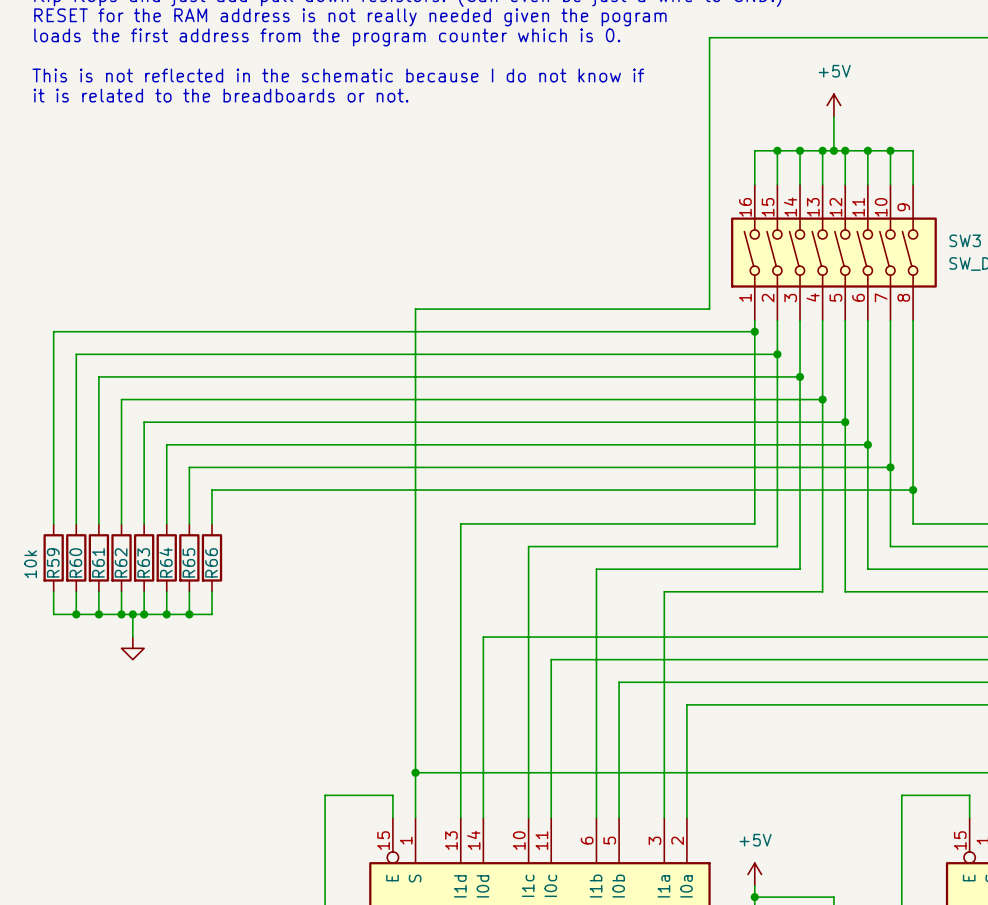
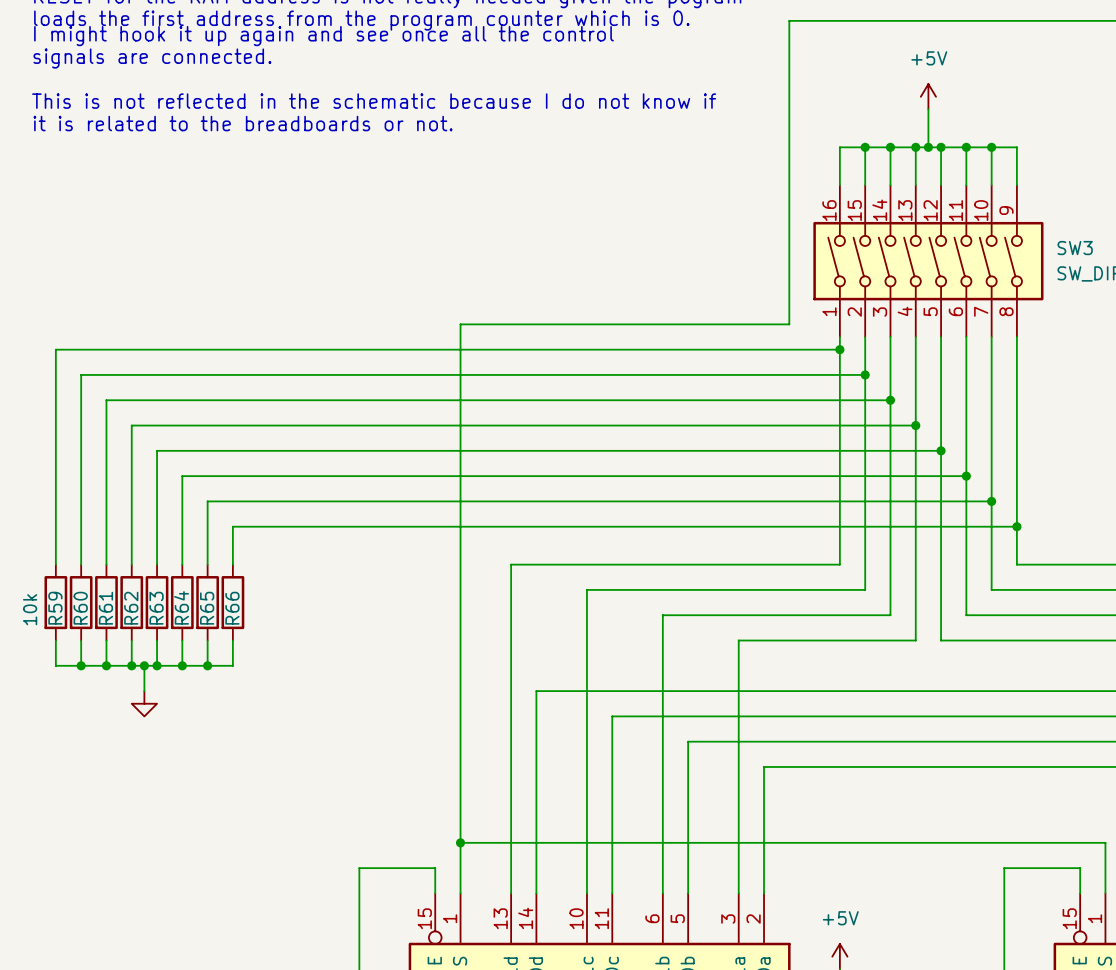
text: none -> I might hook it up again and see once all the control (323, 36)
text: none -> signals are connected. (152, 58)
text position: This is not reflected in the schematic because I do not know if (338, 75) -> This is not reflected in the schematic because I do not know if (374, 101)
text position: it is related to the breadboards or not. (221, 95) -> it is related to the breadboards or not. (243, 123)

